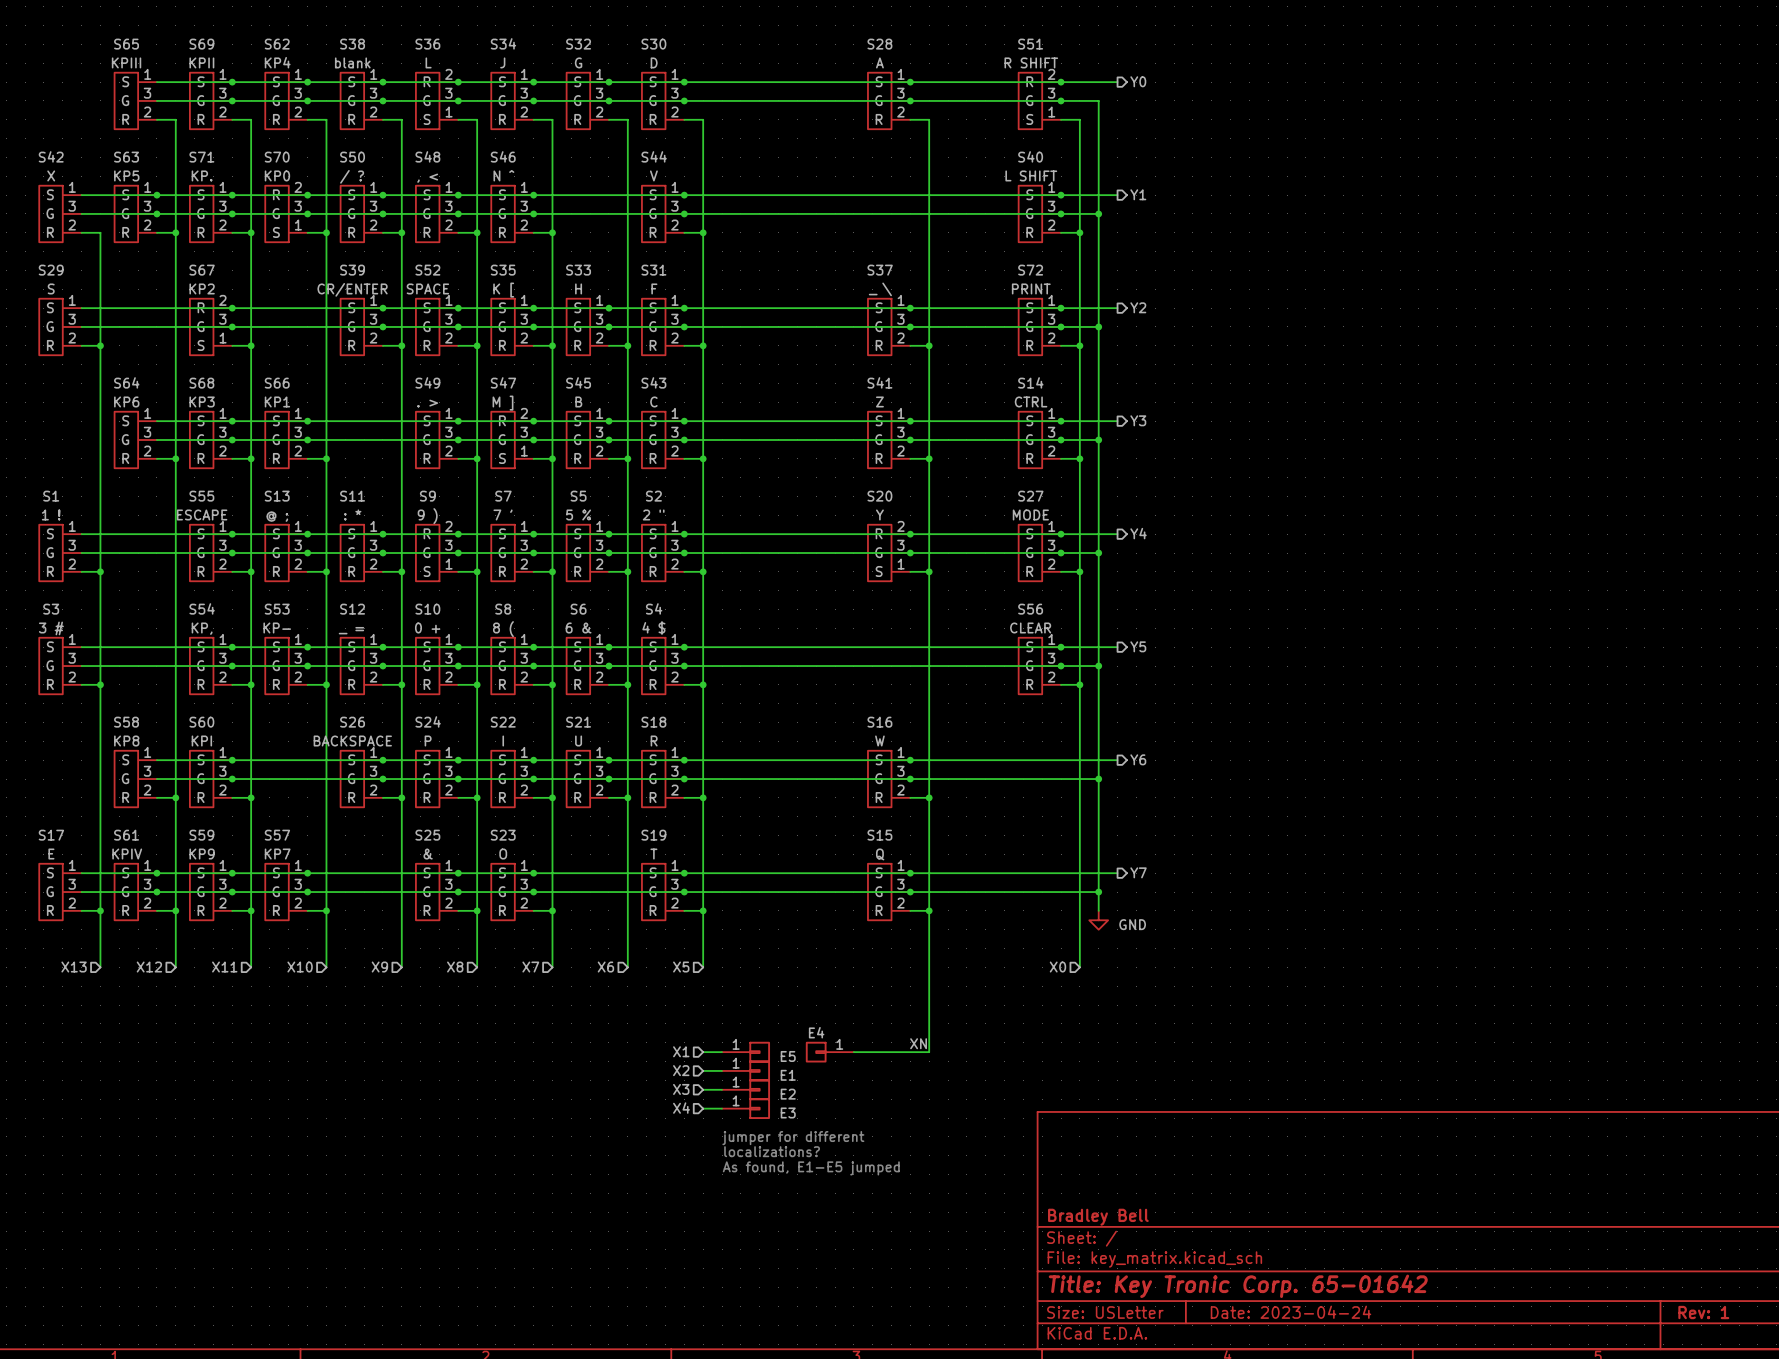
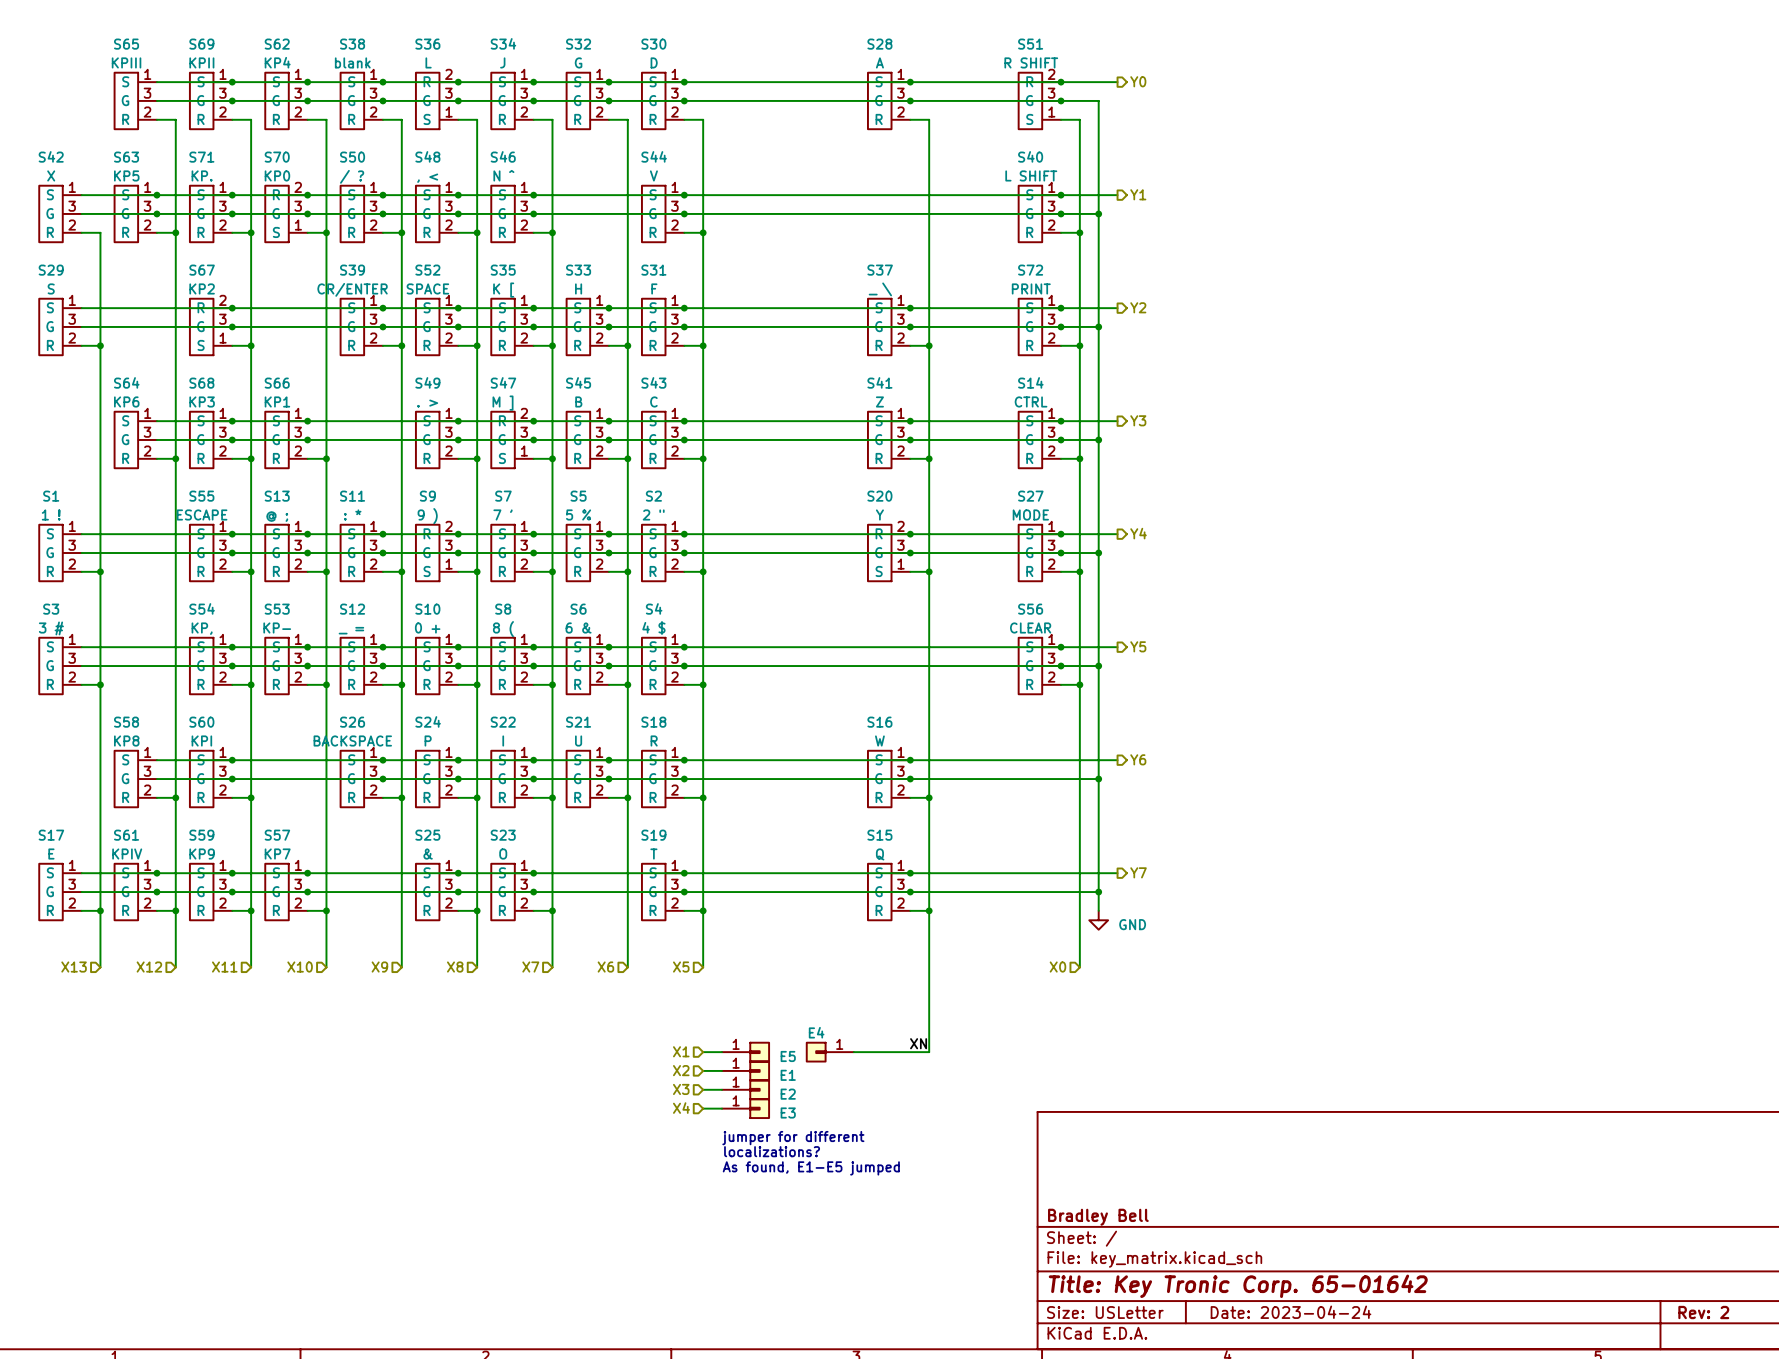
title block: Rev: 1 (1703, 1312) -> Rev: 2 (1703, 1312)

